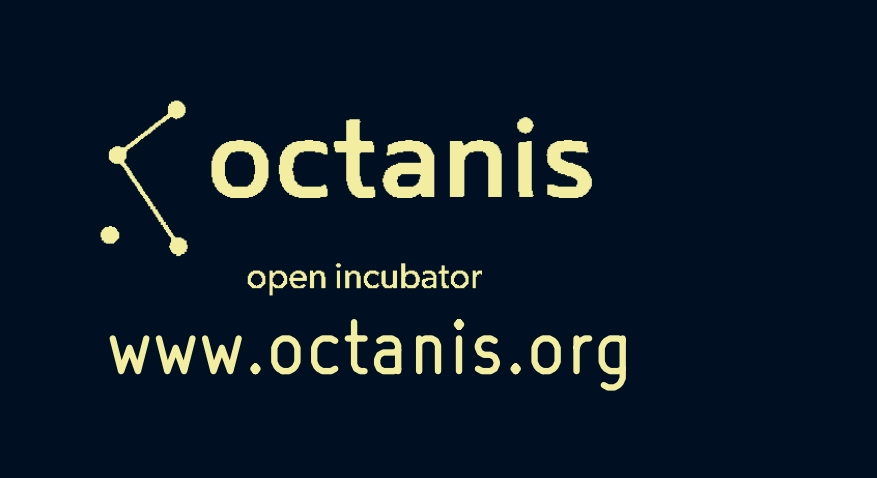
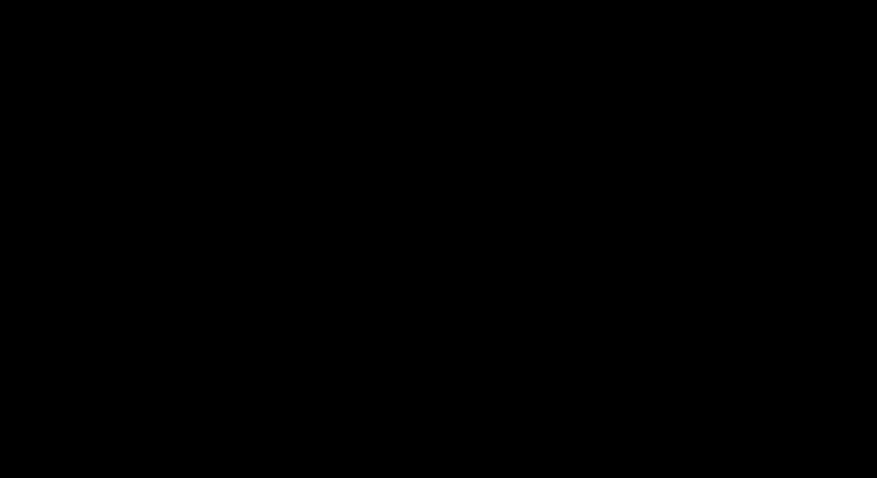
drawing: [100, 100, 592, 257] -> none
drawing: [247, 263, 483, 296] -> none
text: www.octanis.org (367, 354) -> none

